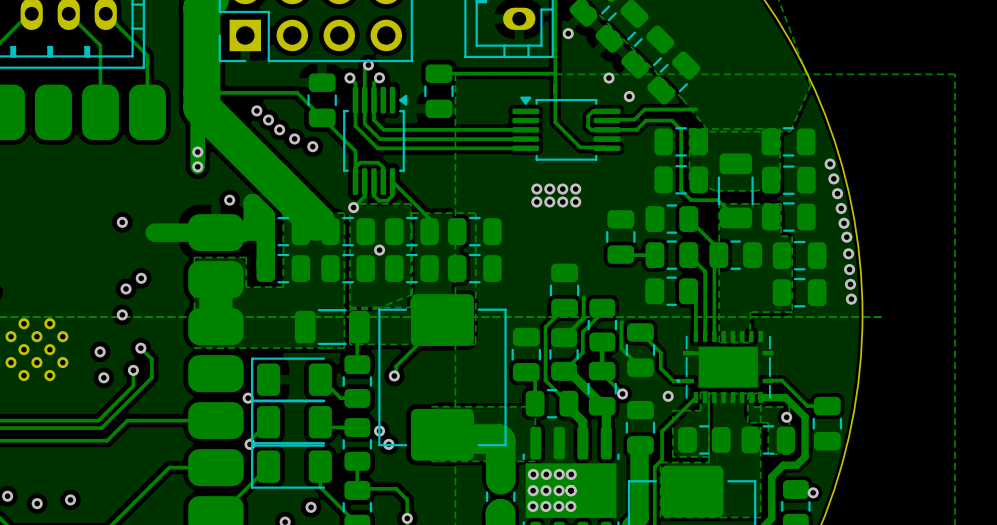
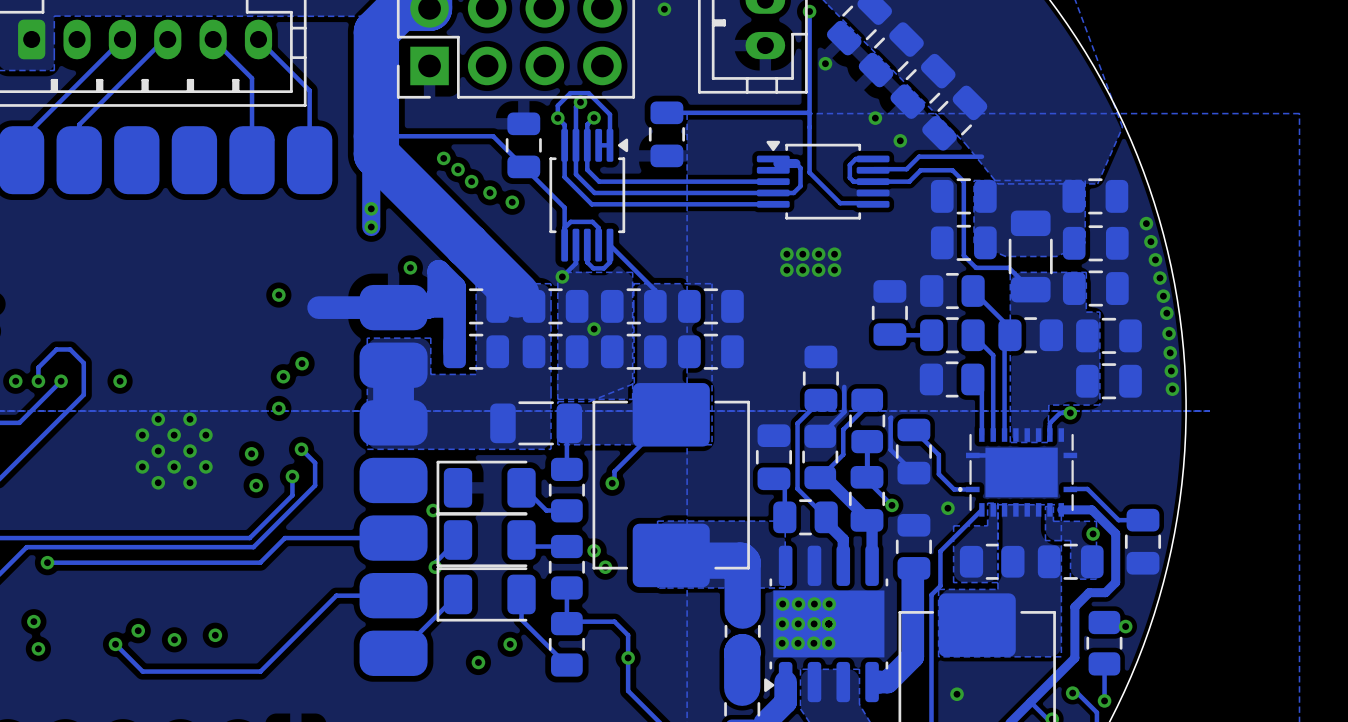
track: none -> (557, 118) (557, 105) (570, 93) (588, 93) (609, 114) (609, 145) (598, 145)
track: none -> (777, 163) (795, 163) (800, 168) (800, 186) (793, 192) (773, 192)
track: none -> (1070, 412) (1060, 412) (1049, 423) (1049, 435)
via: none -> (1070, 412)

